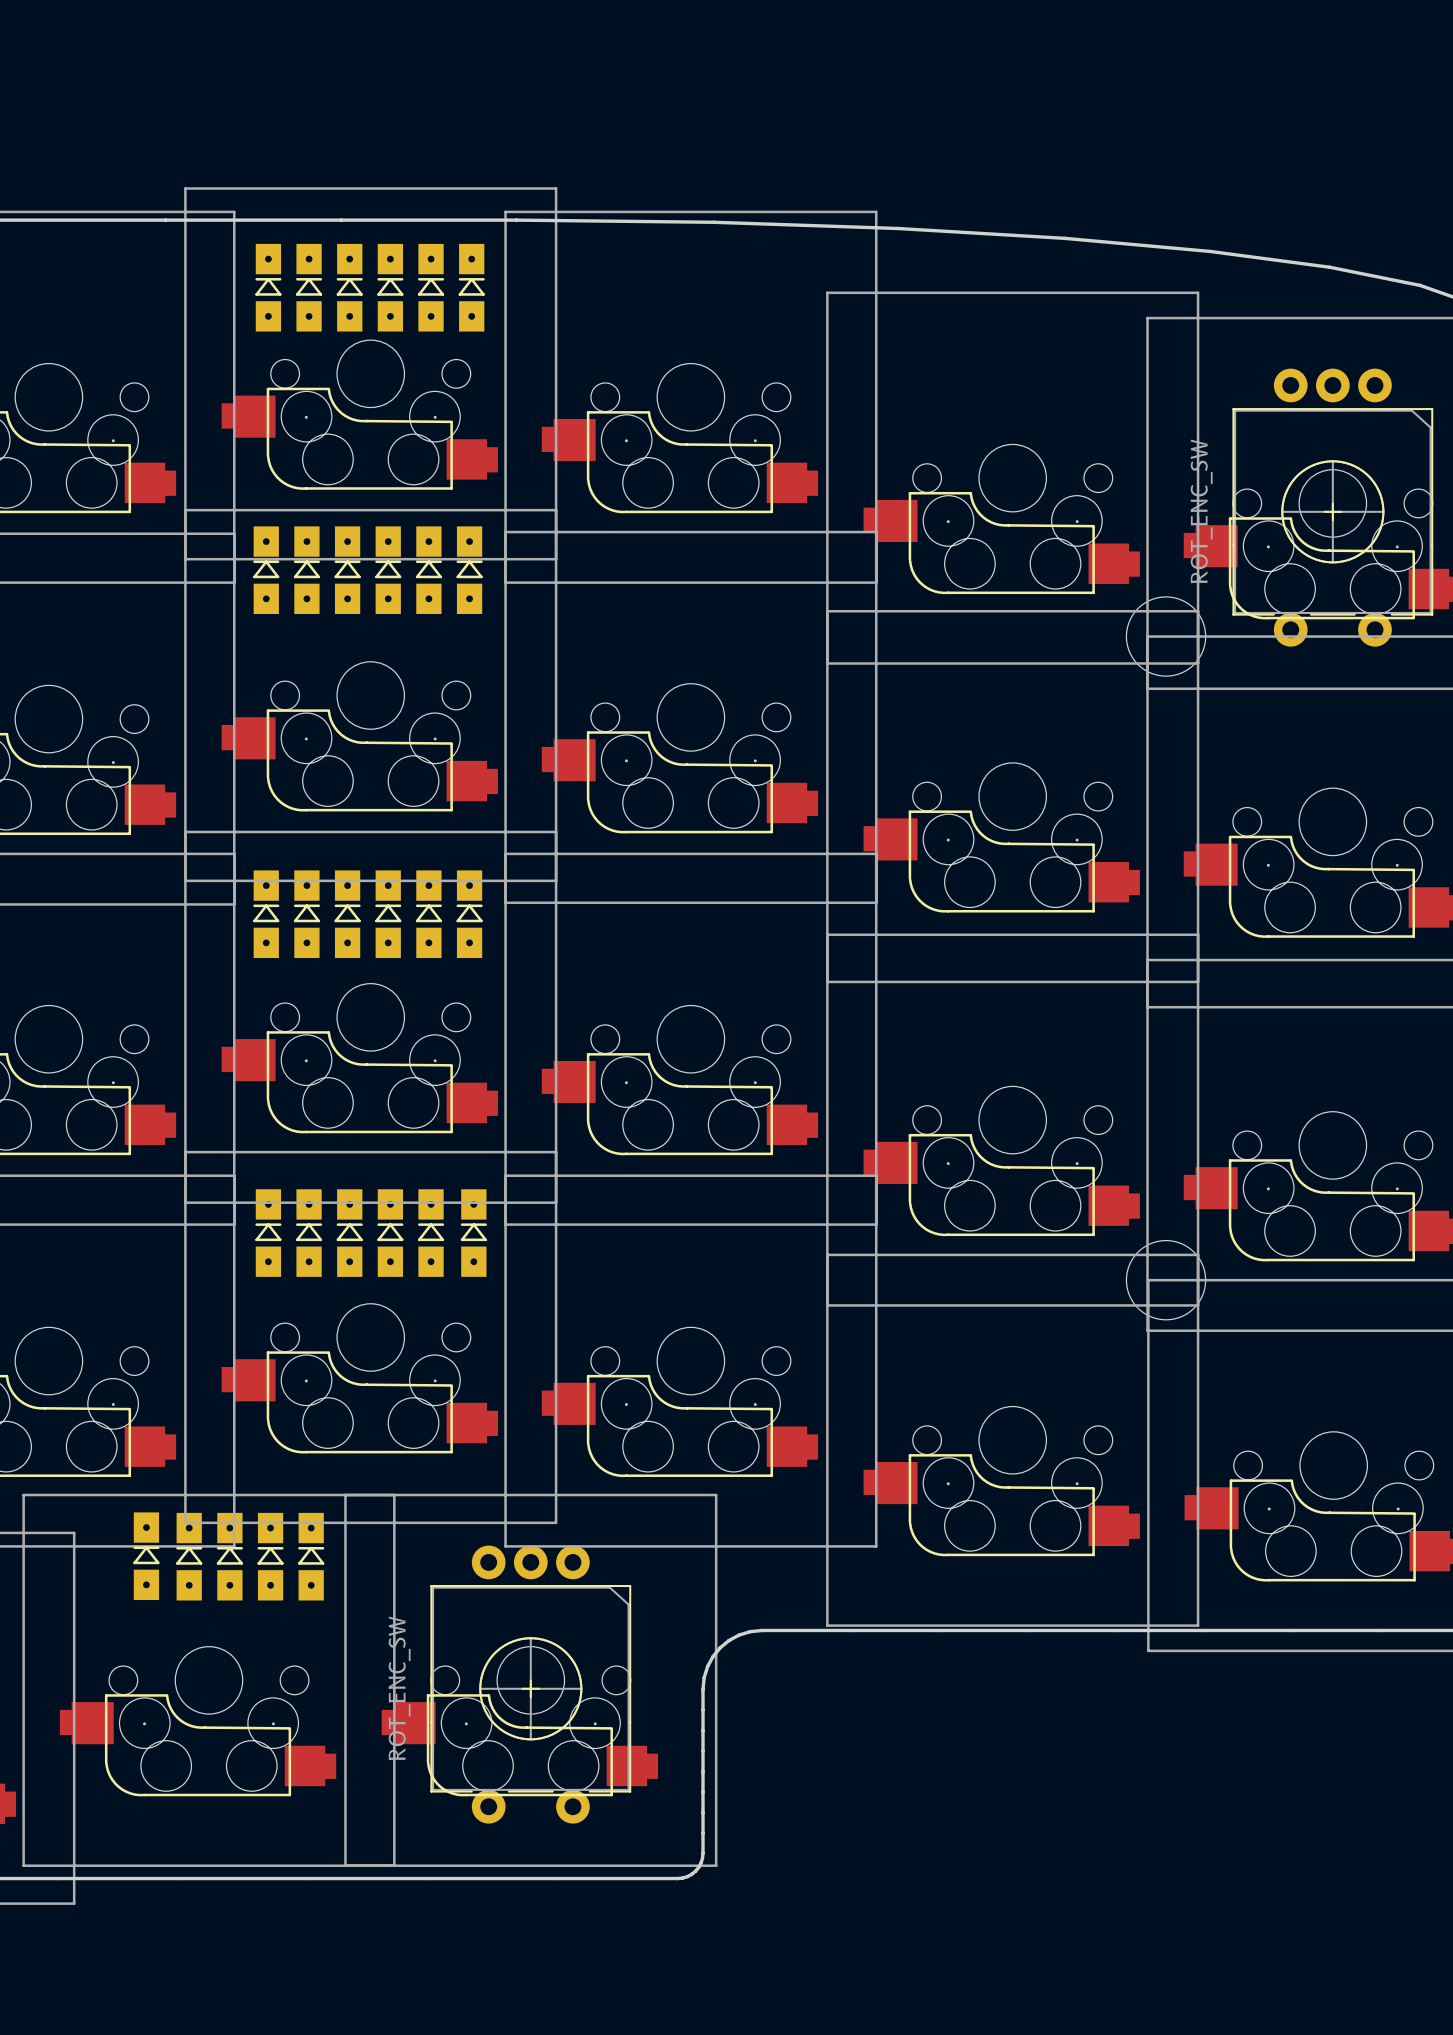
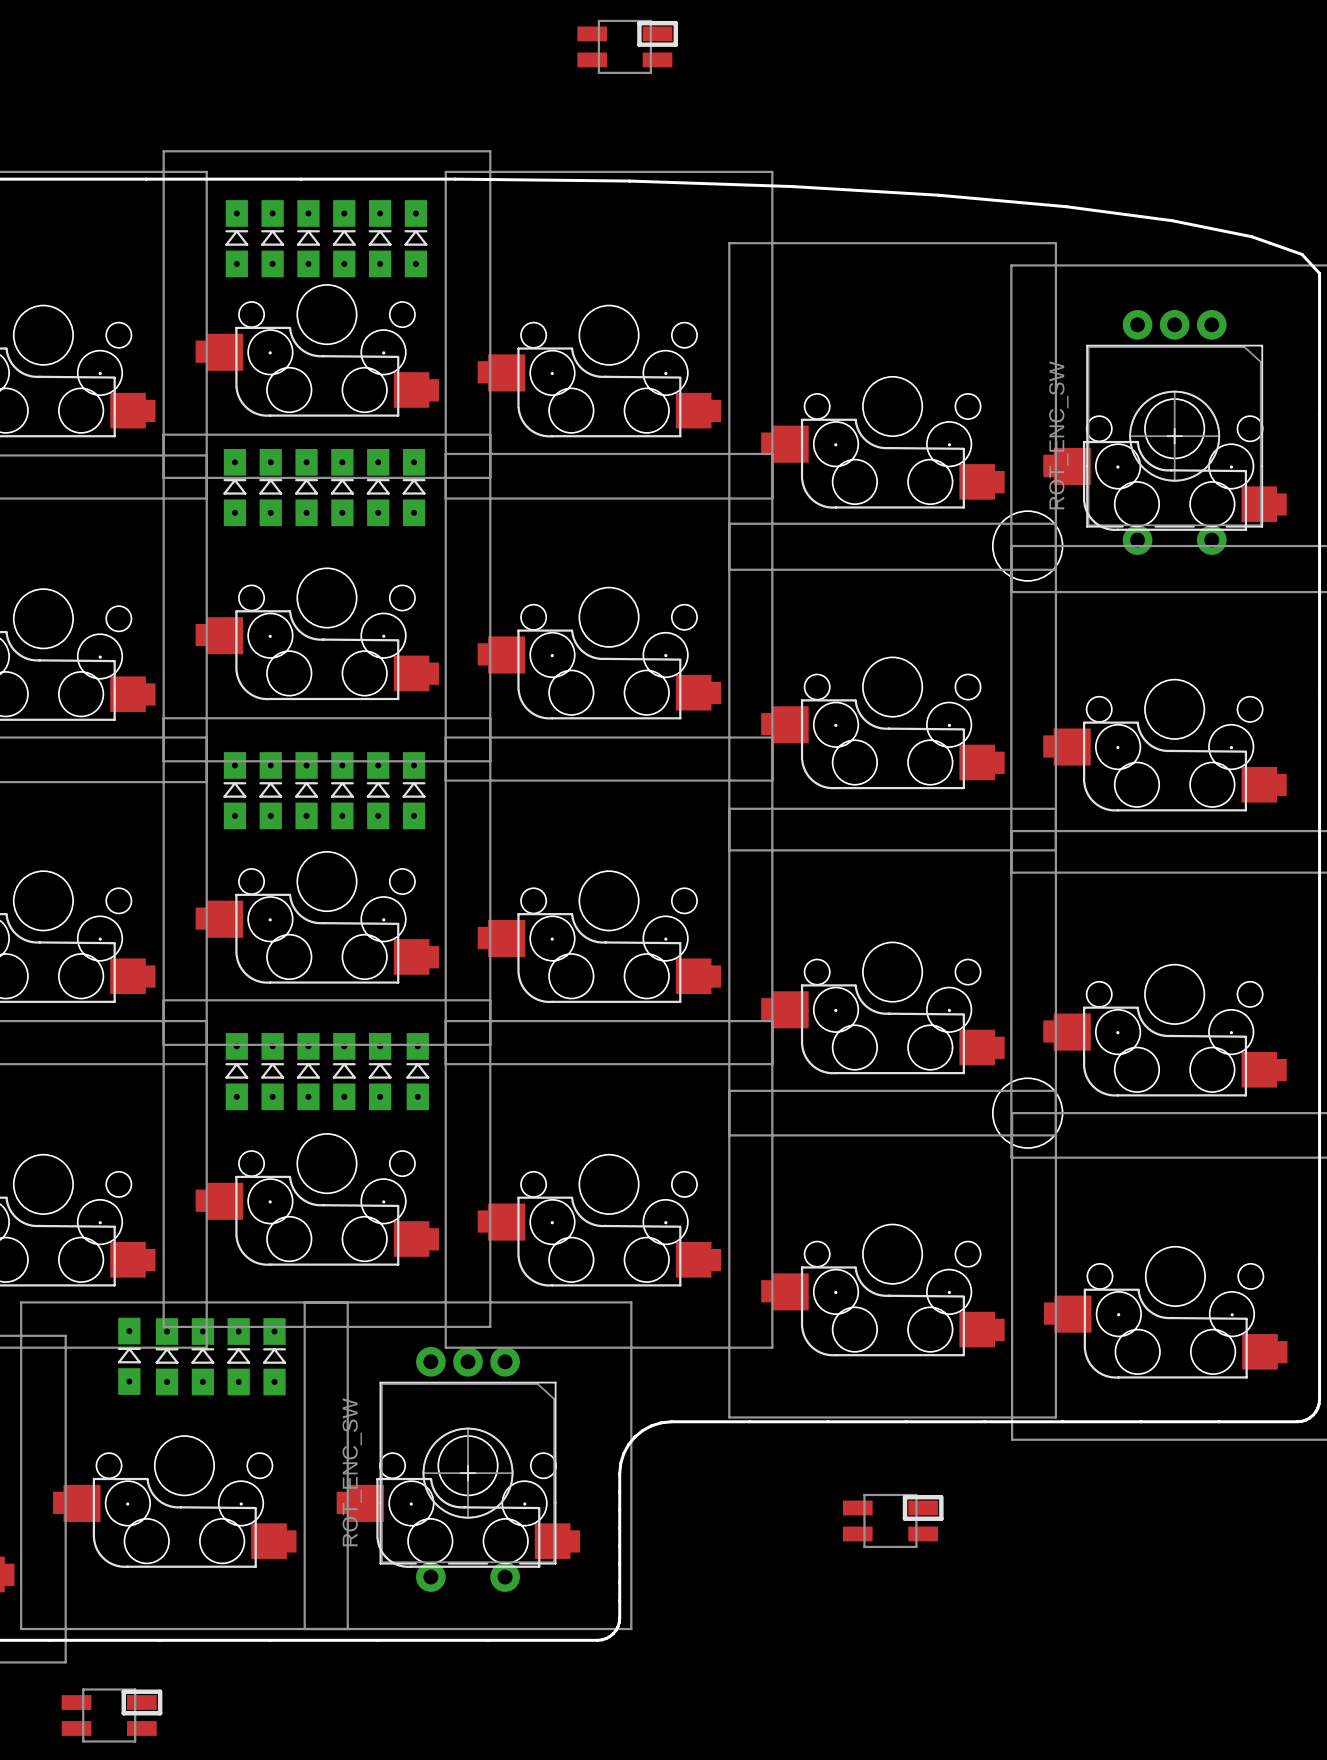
part: none -> (627, 46)
part: none -> (893, 1520)
part: none -> (112, 1715)

